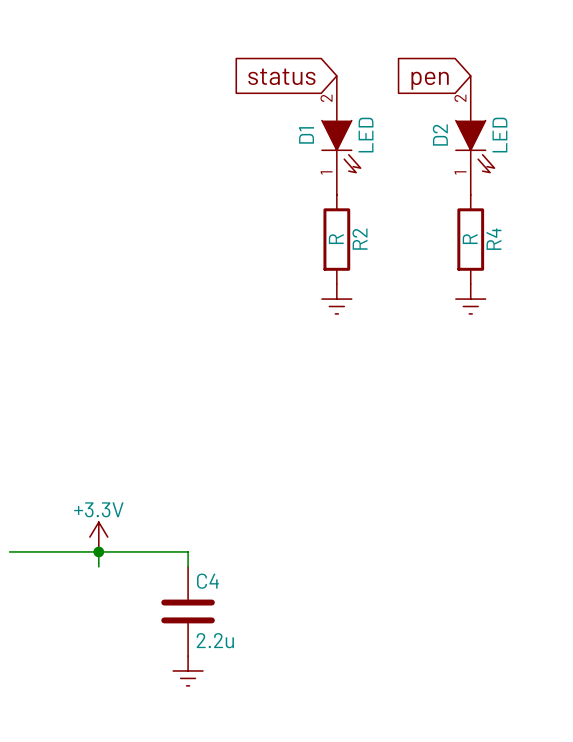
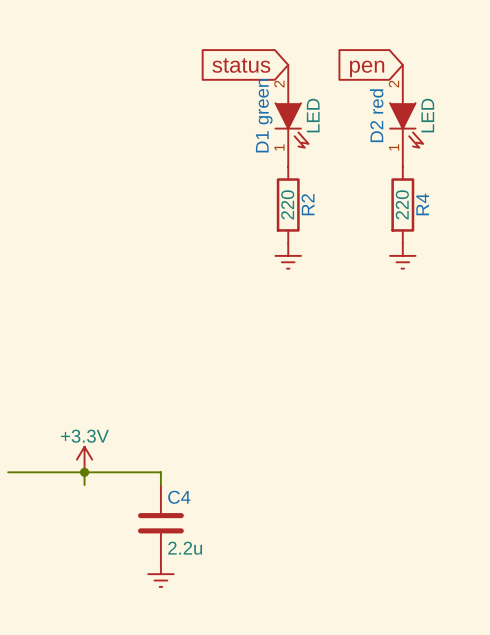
D1 name: D1 (306, 135) -> D1 green (264, 115)
D2 name: D2 (440, 135) -> D2 red (376, 115)
R2 value: R (336, 239) -> 220 (287, 204)
R4 value: R (470, 239) -> 220 (402, 204)

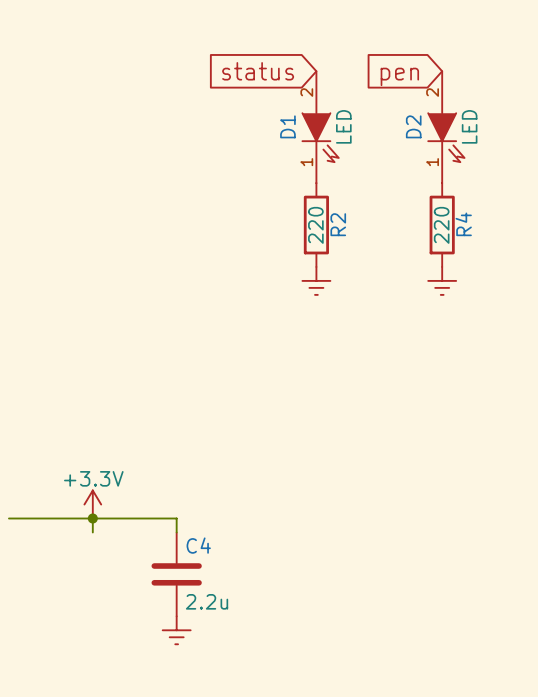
D1 green name: D1 green (264, 115) -> D1 (287, 126)
D2 red name: D2 red (376, 115) -> D2 (413, 126)

